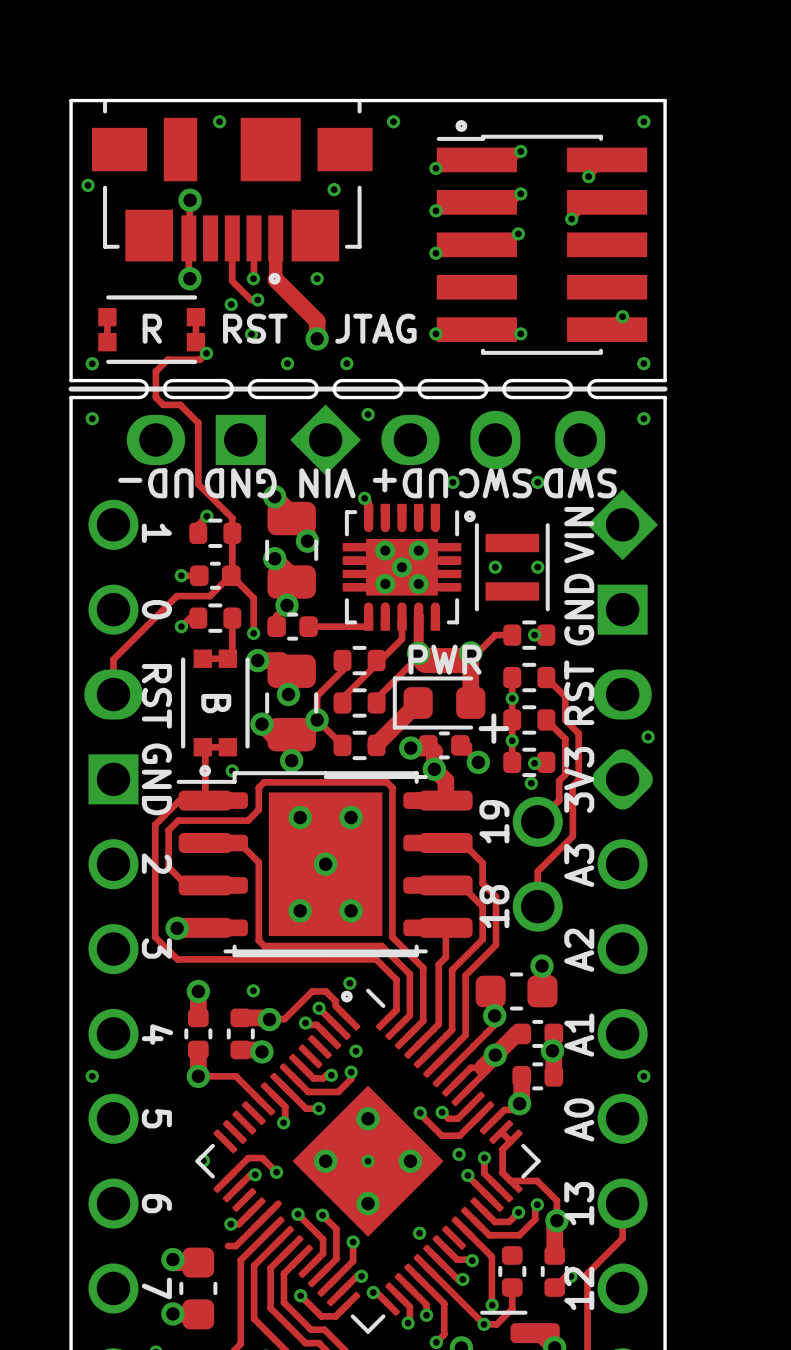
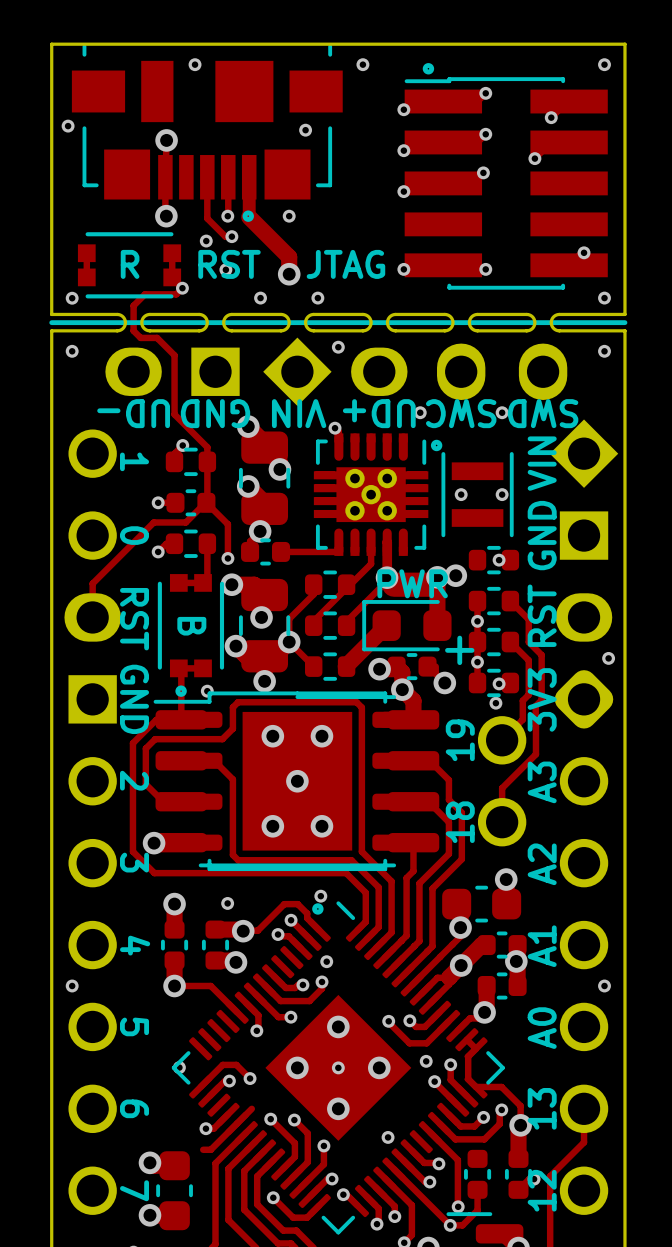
track: (507, 635) (495, 635) (477, 652) (470, 652) -> none
via: none -> (455, 575)

